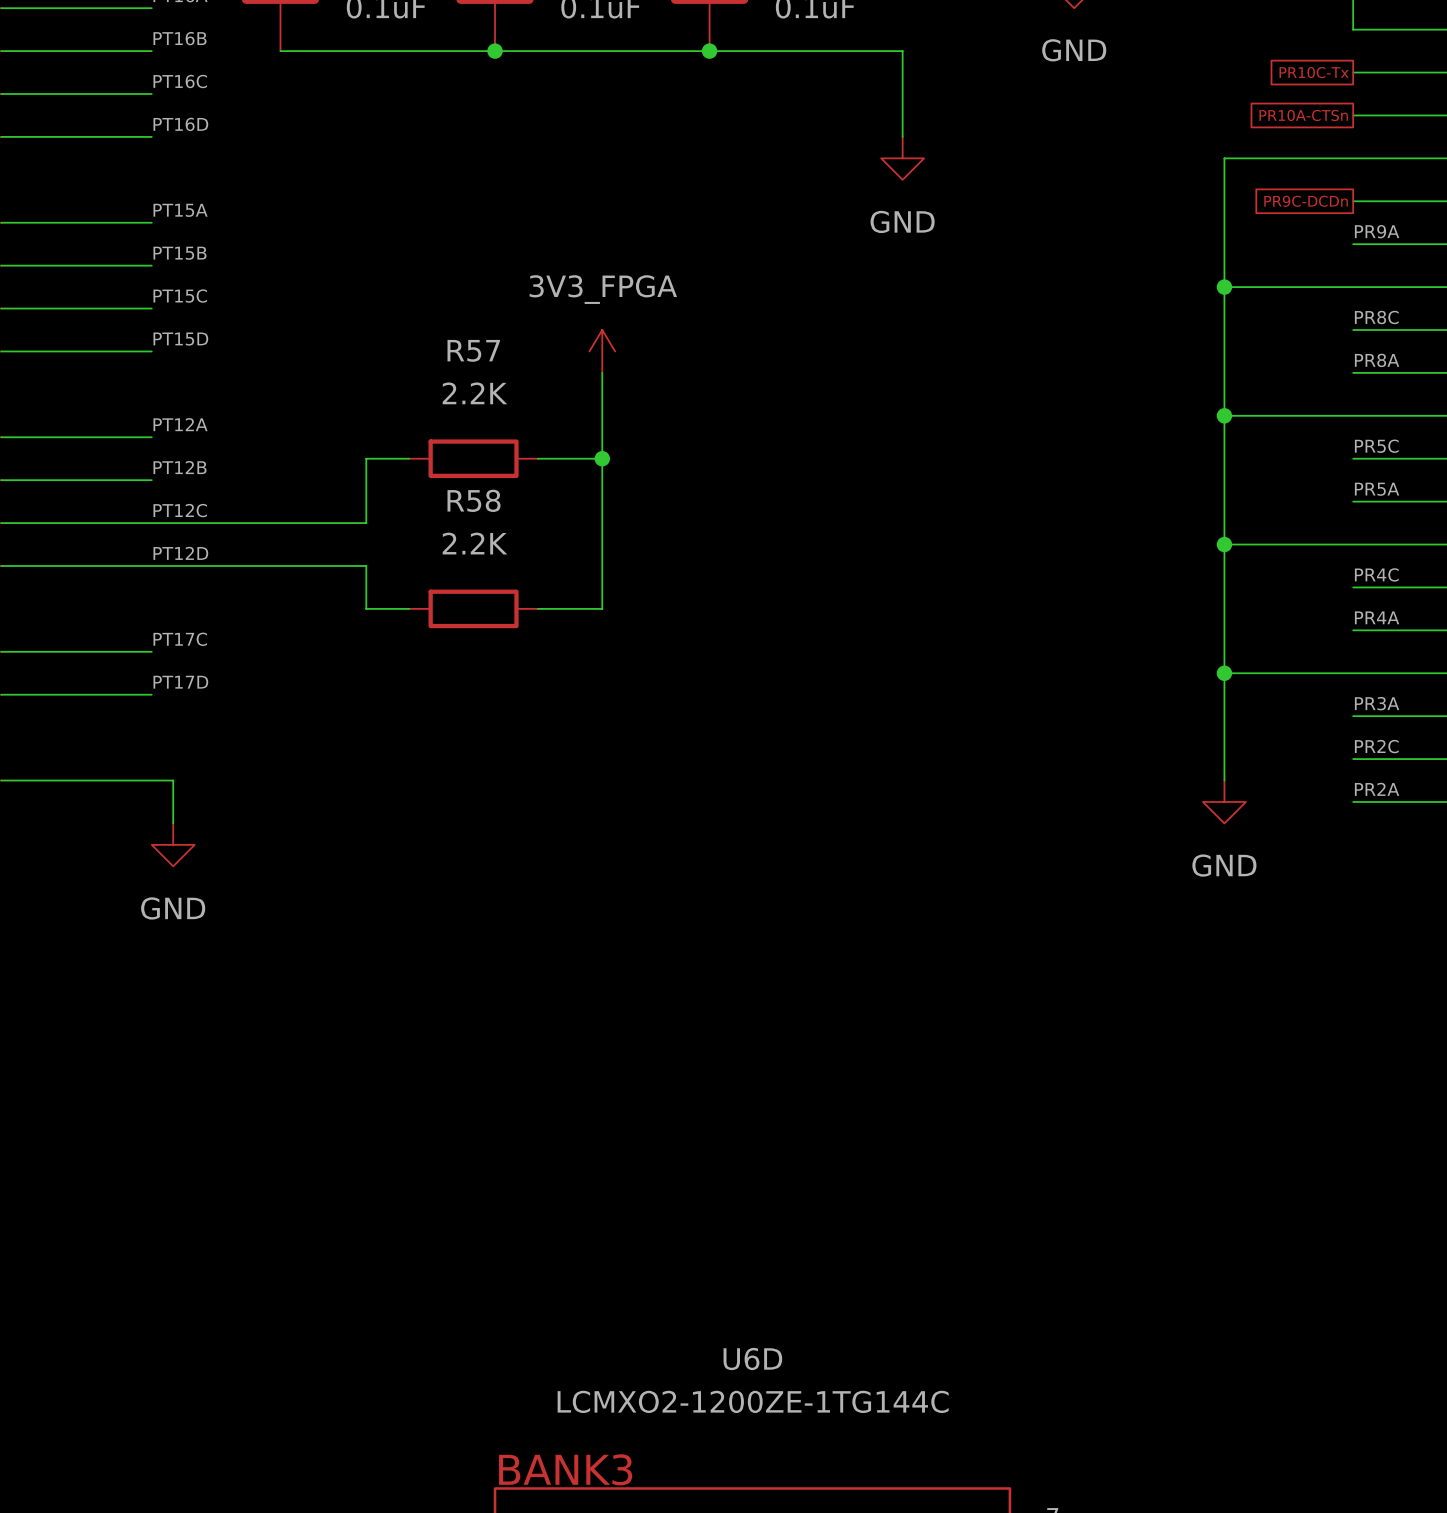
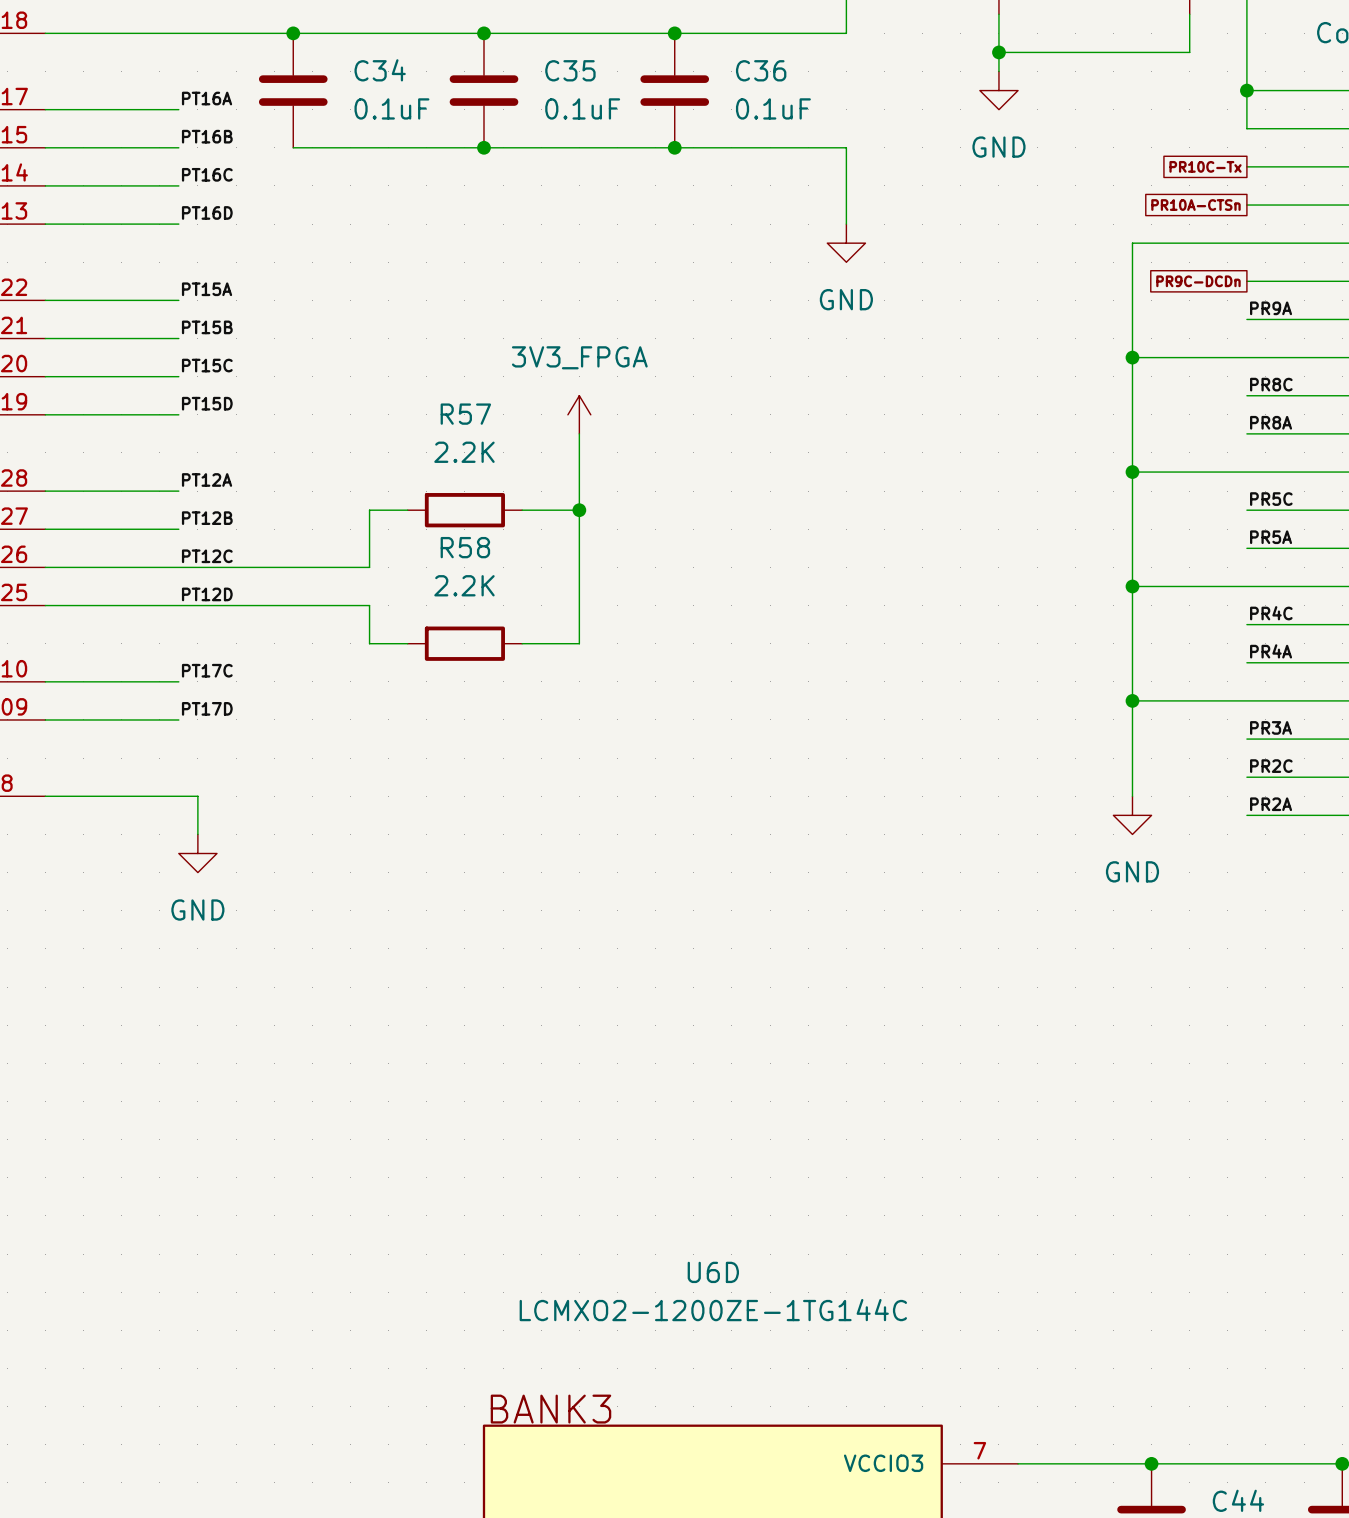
U6D name position: U6D (752, 1358) -> U6D (713, 1272)
U6D value position: LCMXO2-1200ZE-1TG144C (753, 1401) -> LCMXO2-1200ZE-1TG144C (713, 1310)

